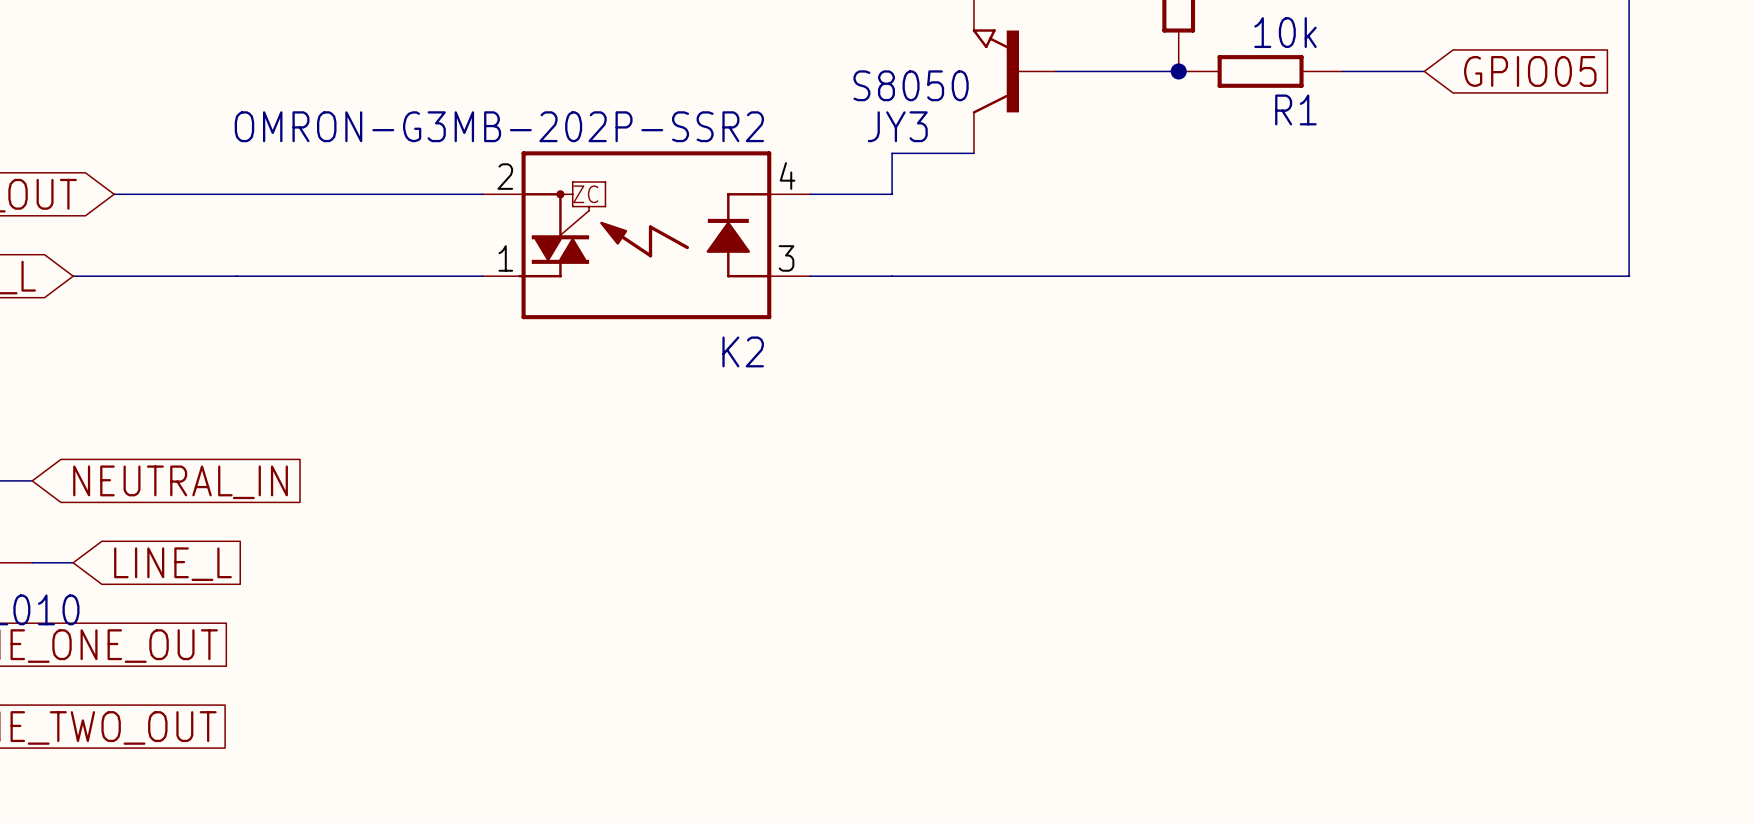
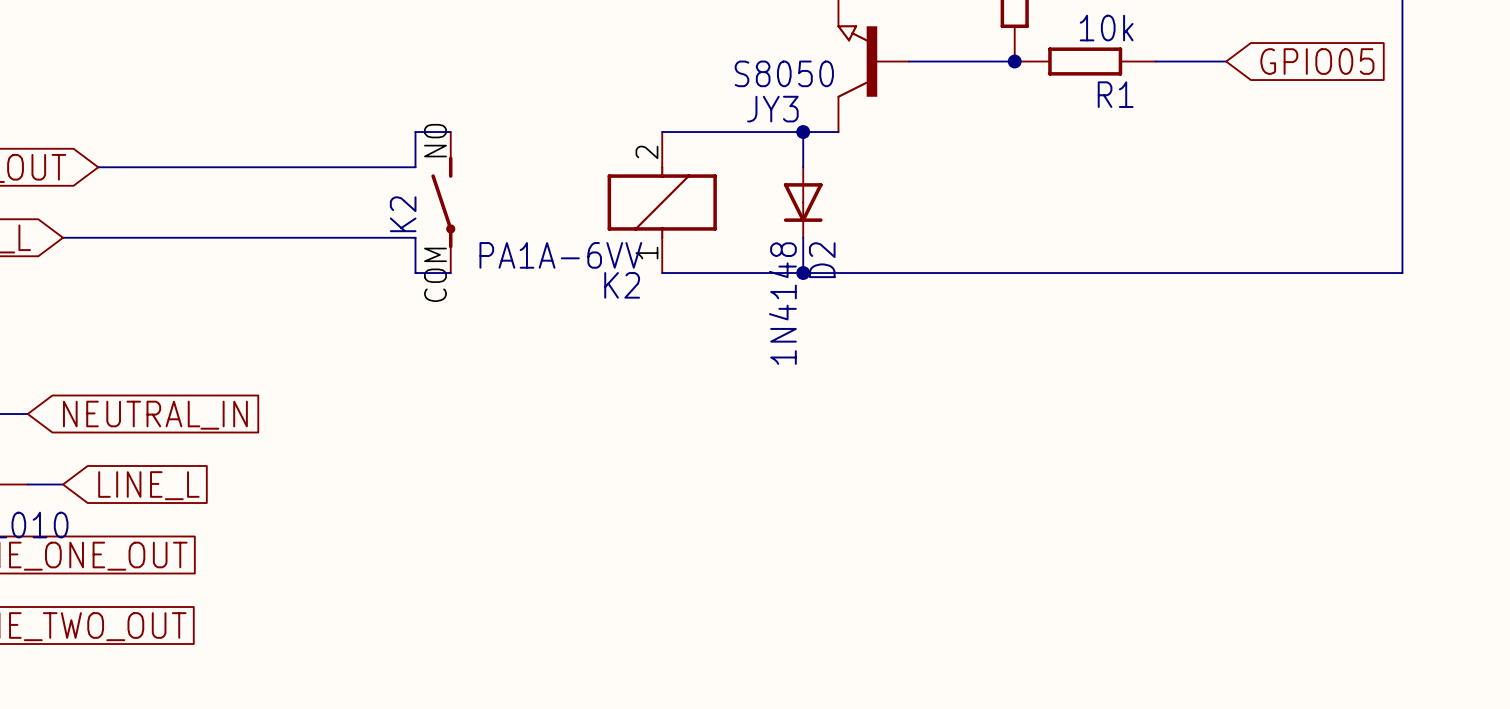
wire: none -> (450, 132) (415, 132) (415, 167)
wire: (892, 153) (892, 194) (810, 194) -> (767, 132) (662, 132)
wire: none -> (803, 132) (803, 167)
junction: none -> (803, 132)
K2: none -> (443, 202)
K2: OMRON-G3MB-202P-SSR2 (646, 235) -> none
K2: none -> PA1A-6VV (662, 202)
D2: none -> 1N4148 (803, 202)
wire: none -> (415, 237) (415, 273) (450, 273)
wire: (810, 276) (1629, 276) -> (662, 273) (1402, 273) (1402, 237)
wire: none -> (803, 237) (803, 273)
junction: none -> (803, 273)

